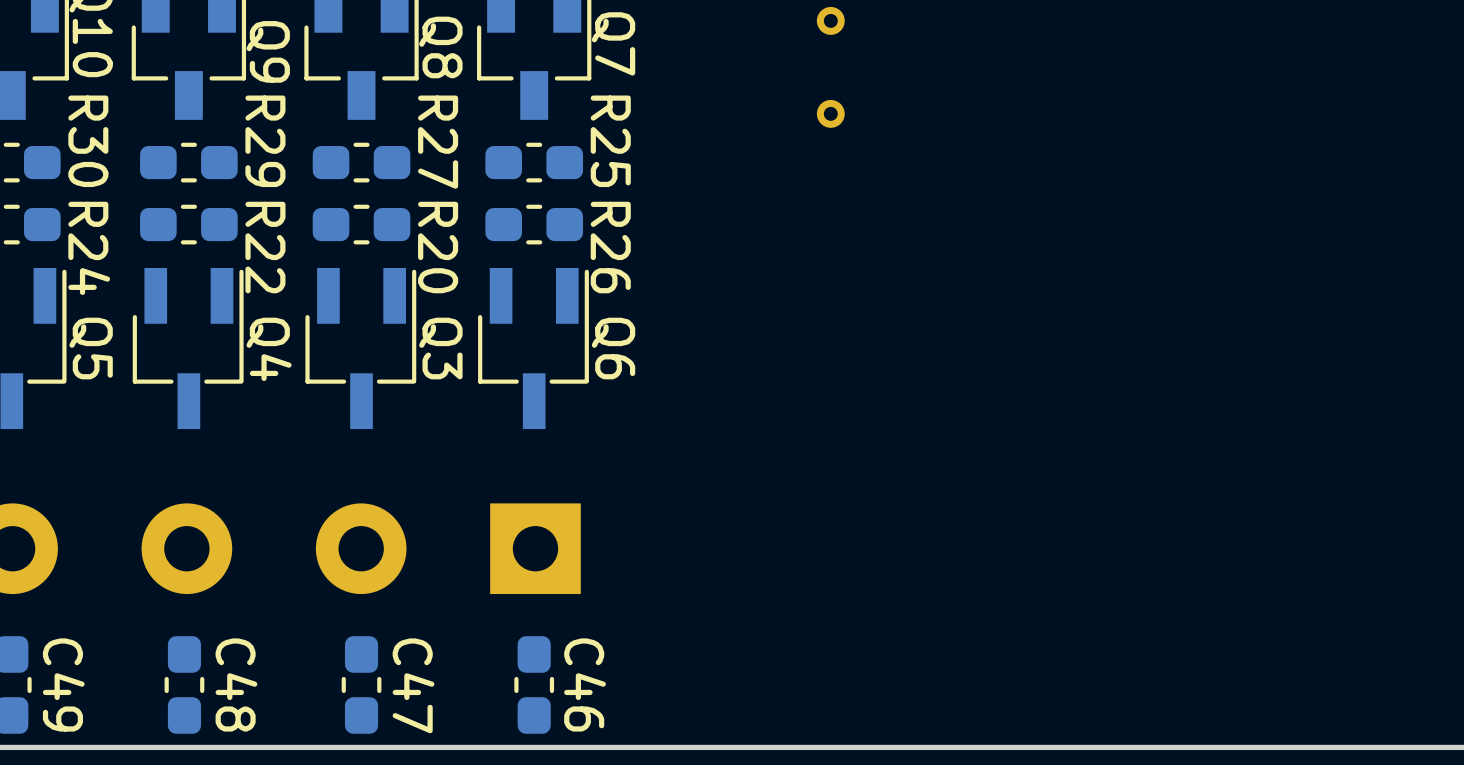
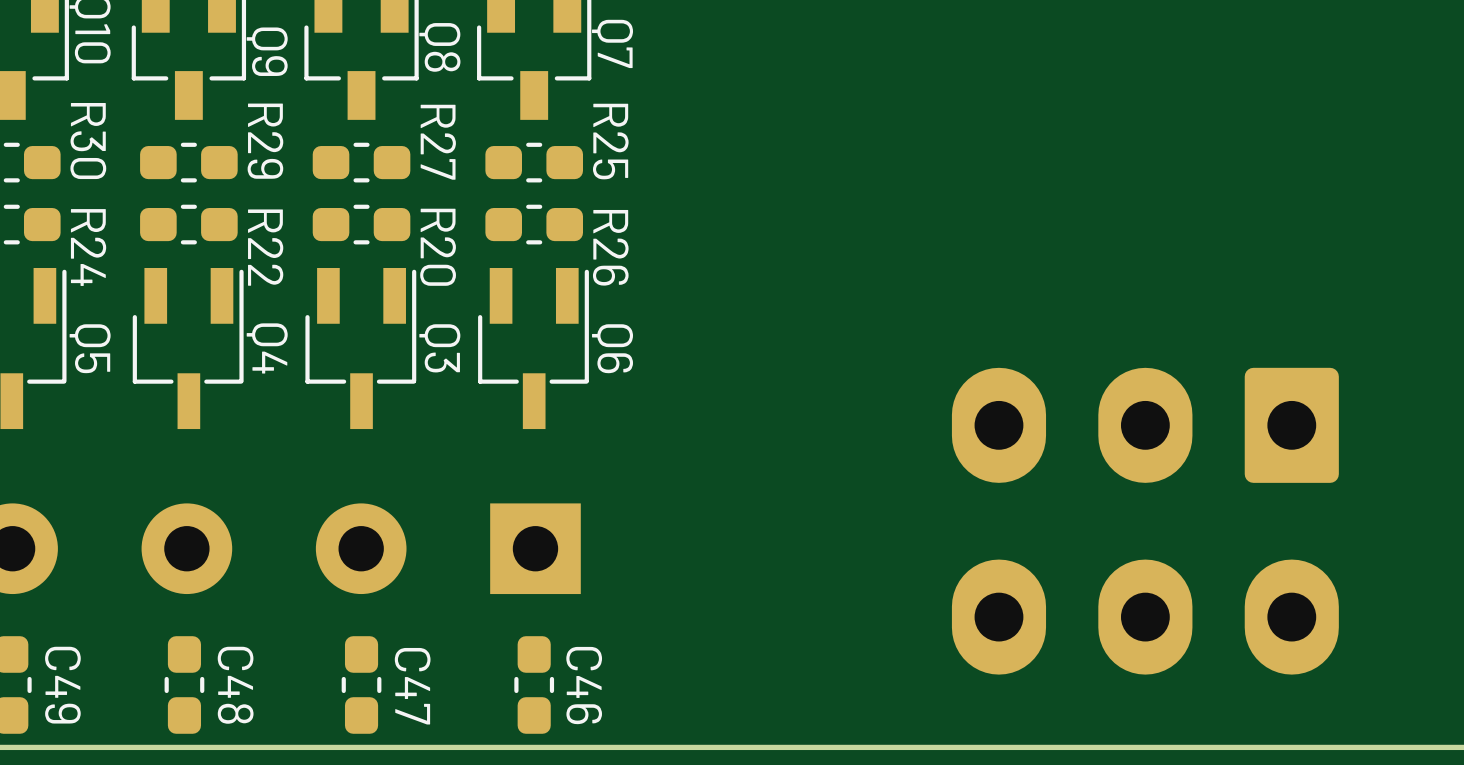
part: (830, 20) -> none
part: (830, 113) -> none
part: none -> (1145, 521)

